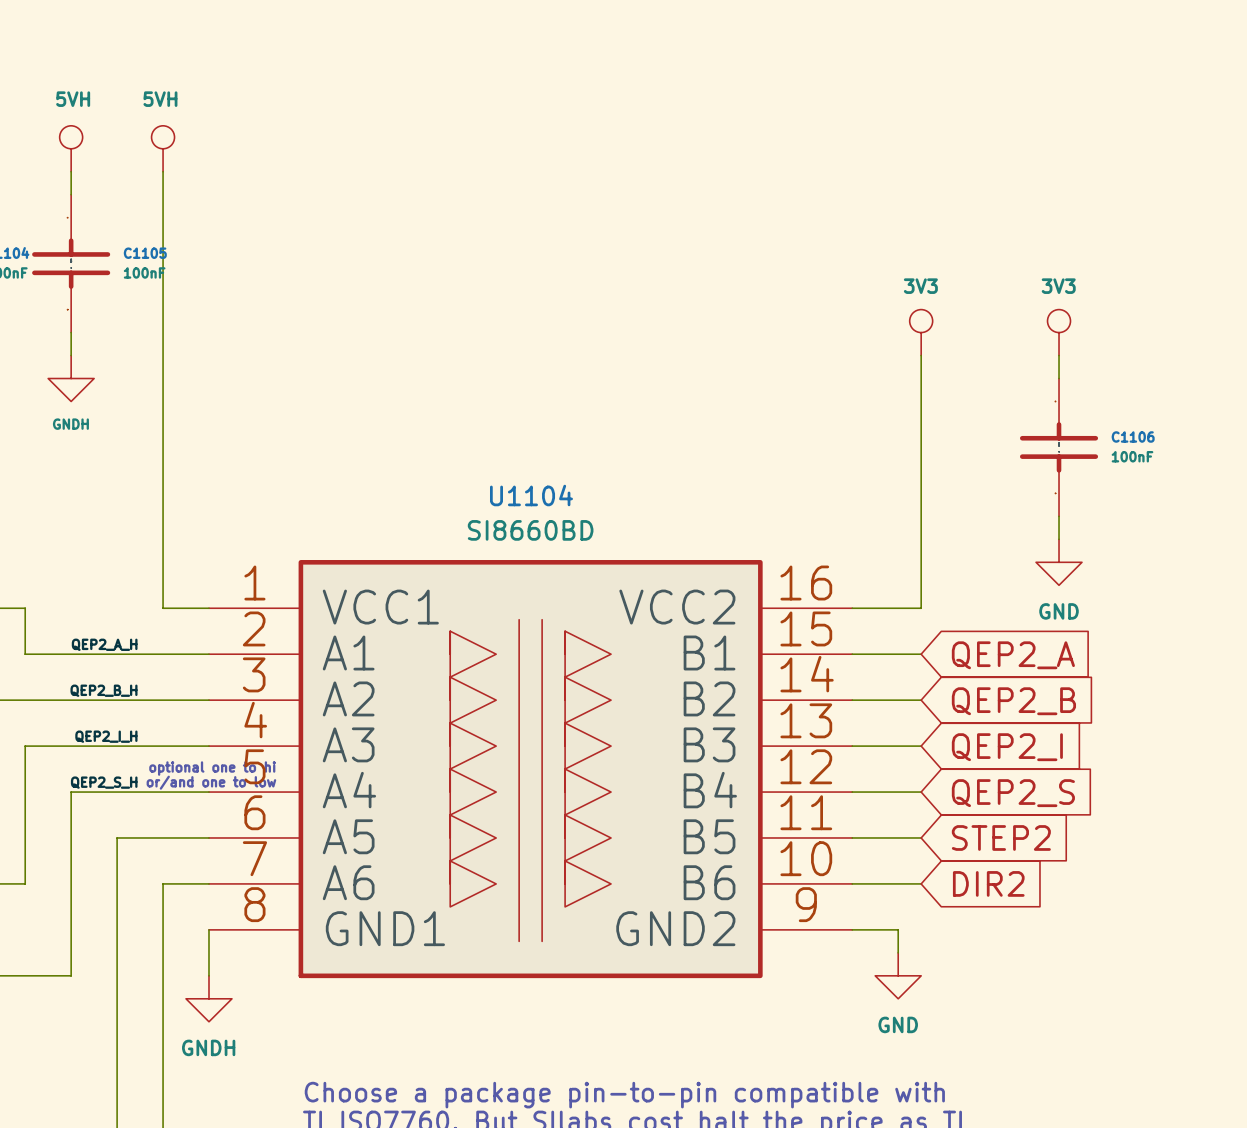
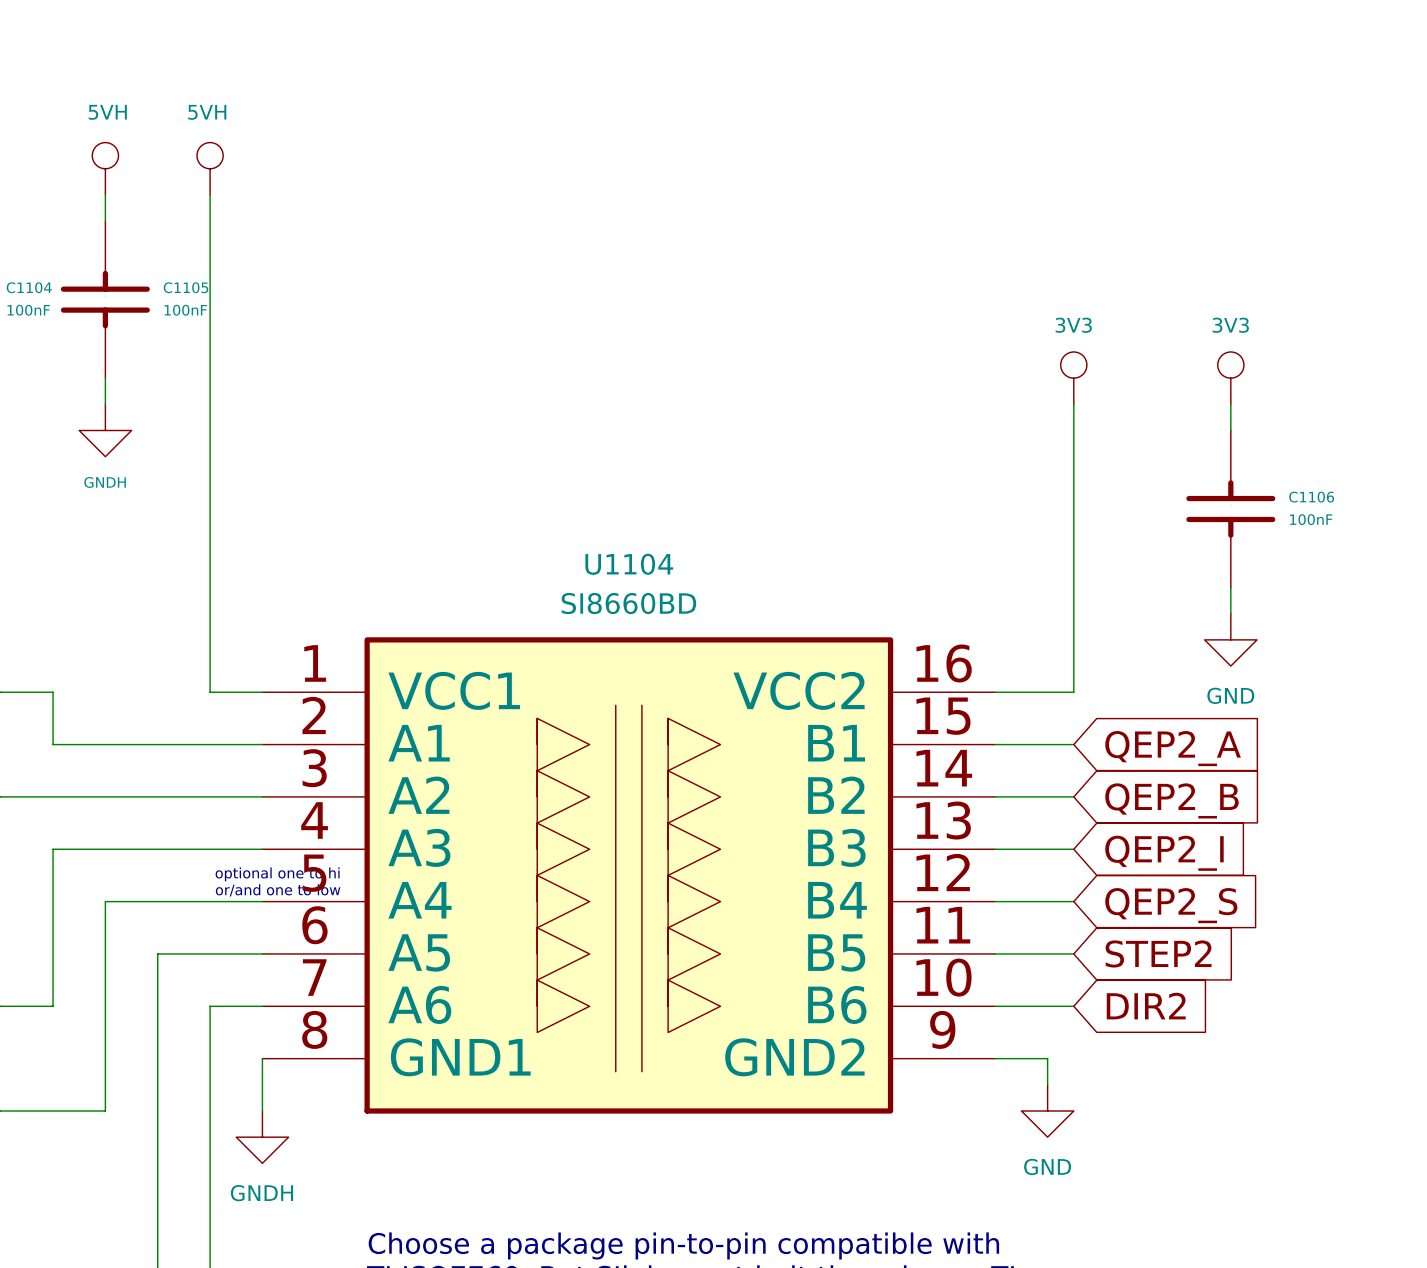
label: QEP2_A_H (104, 644) -> none
label: QEP2_B_H (103, 690) -> none
label: QEP2_I_H (106, 736) -> none
label: QEP2_S_H (104, 782) -> none

